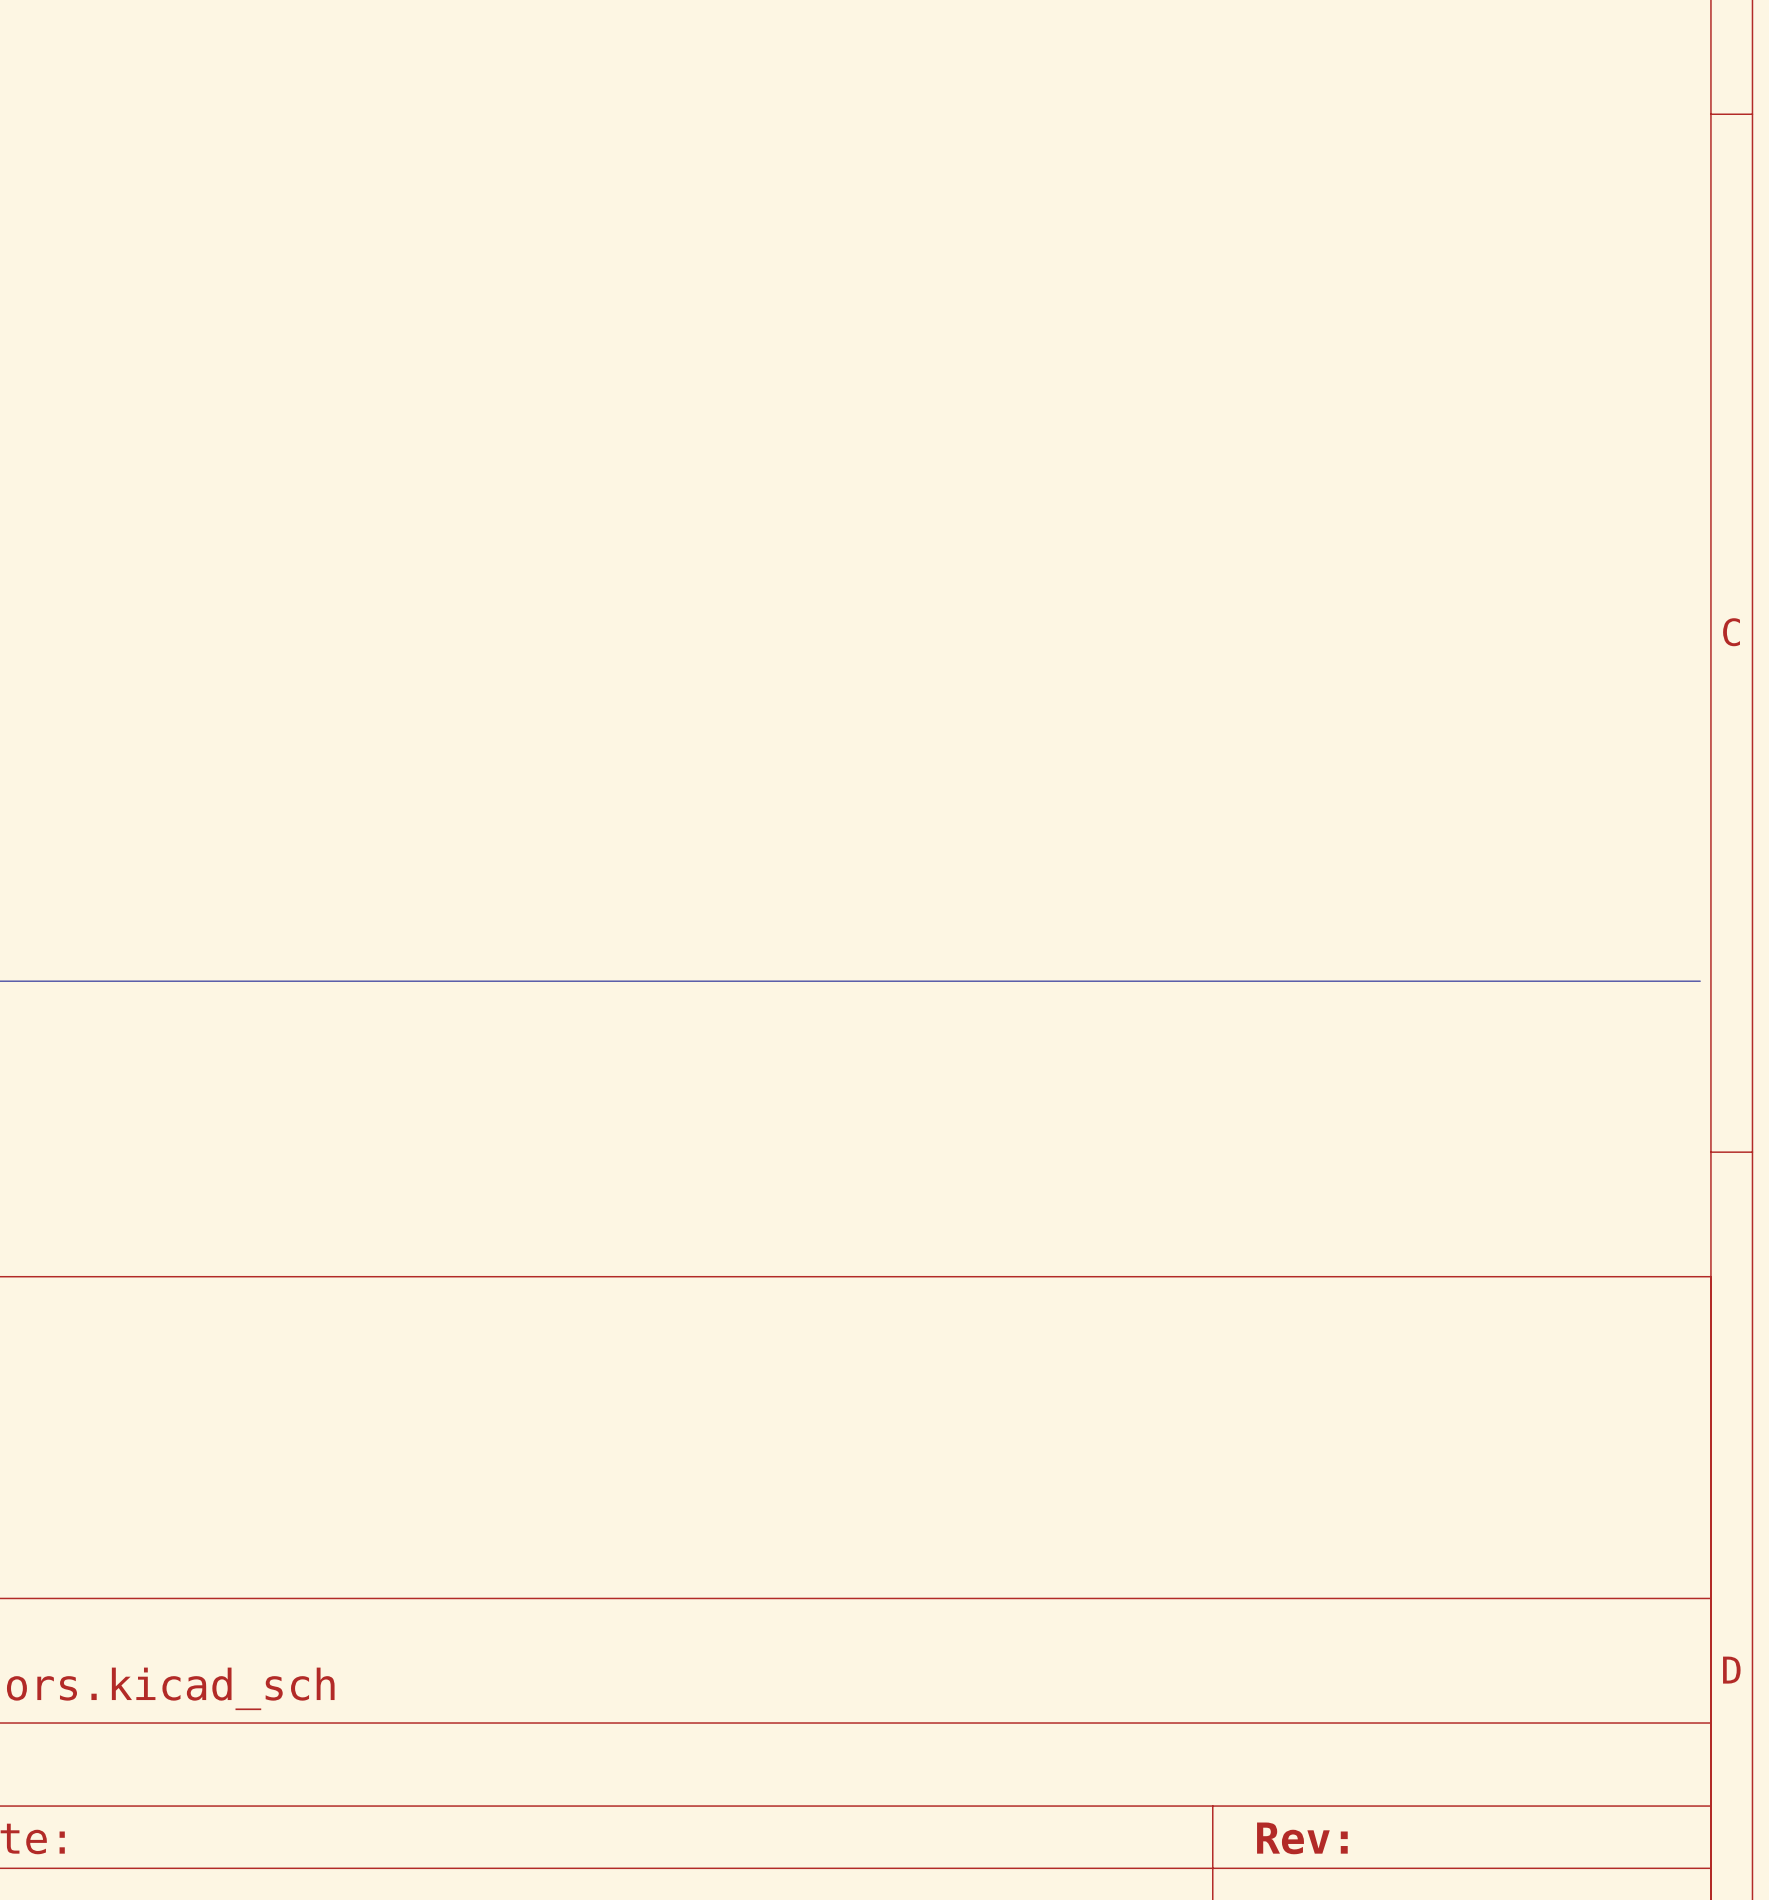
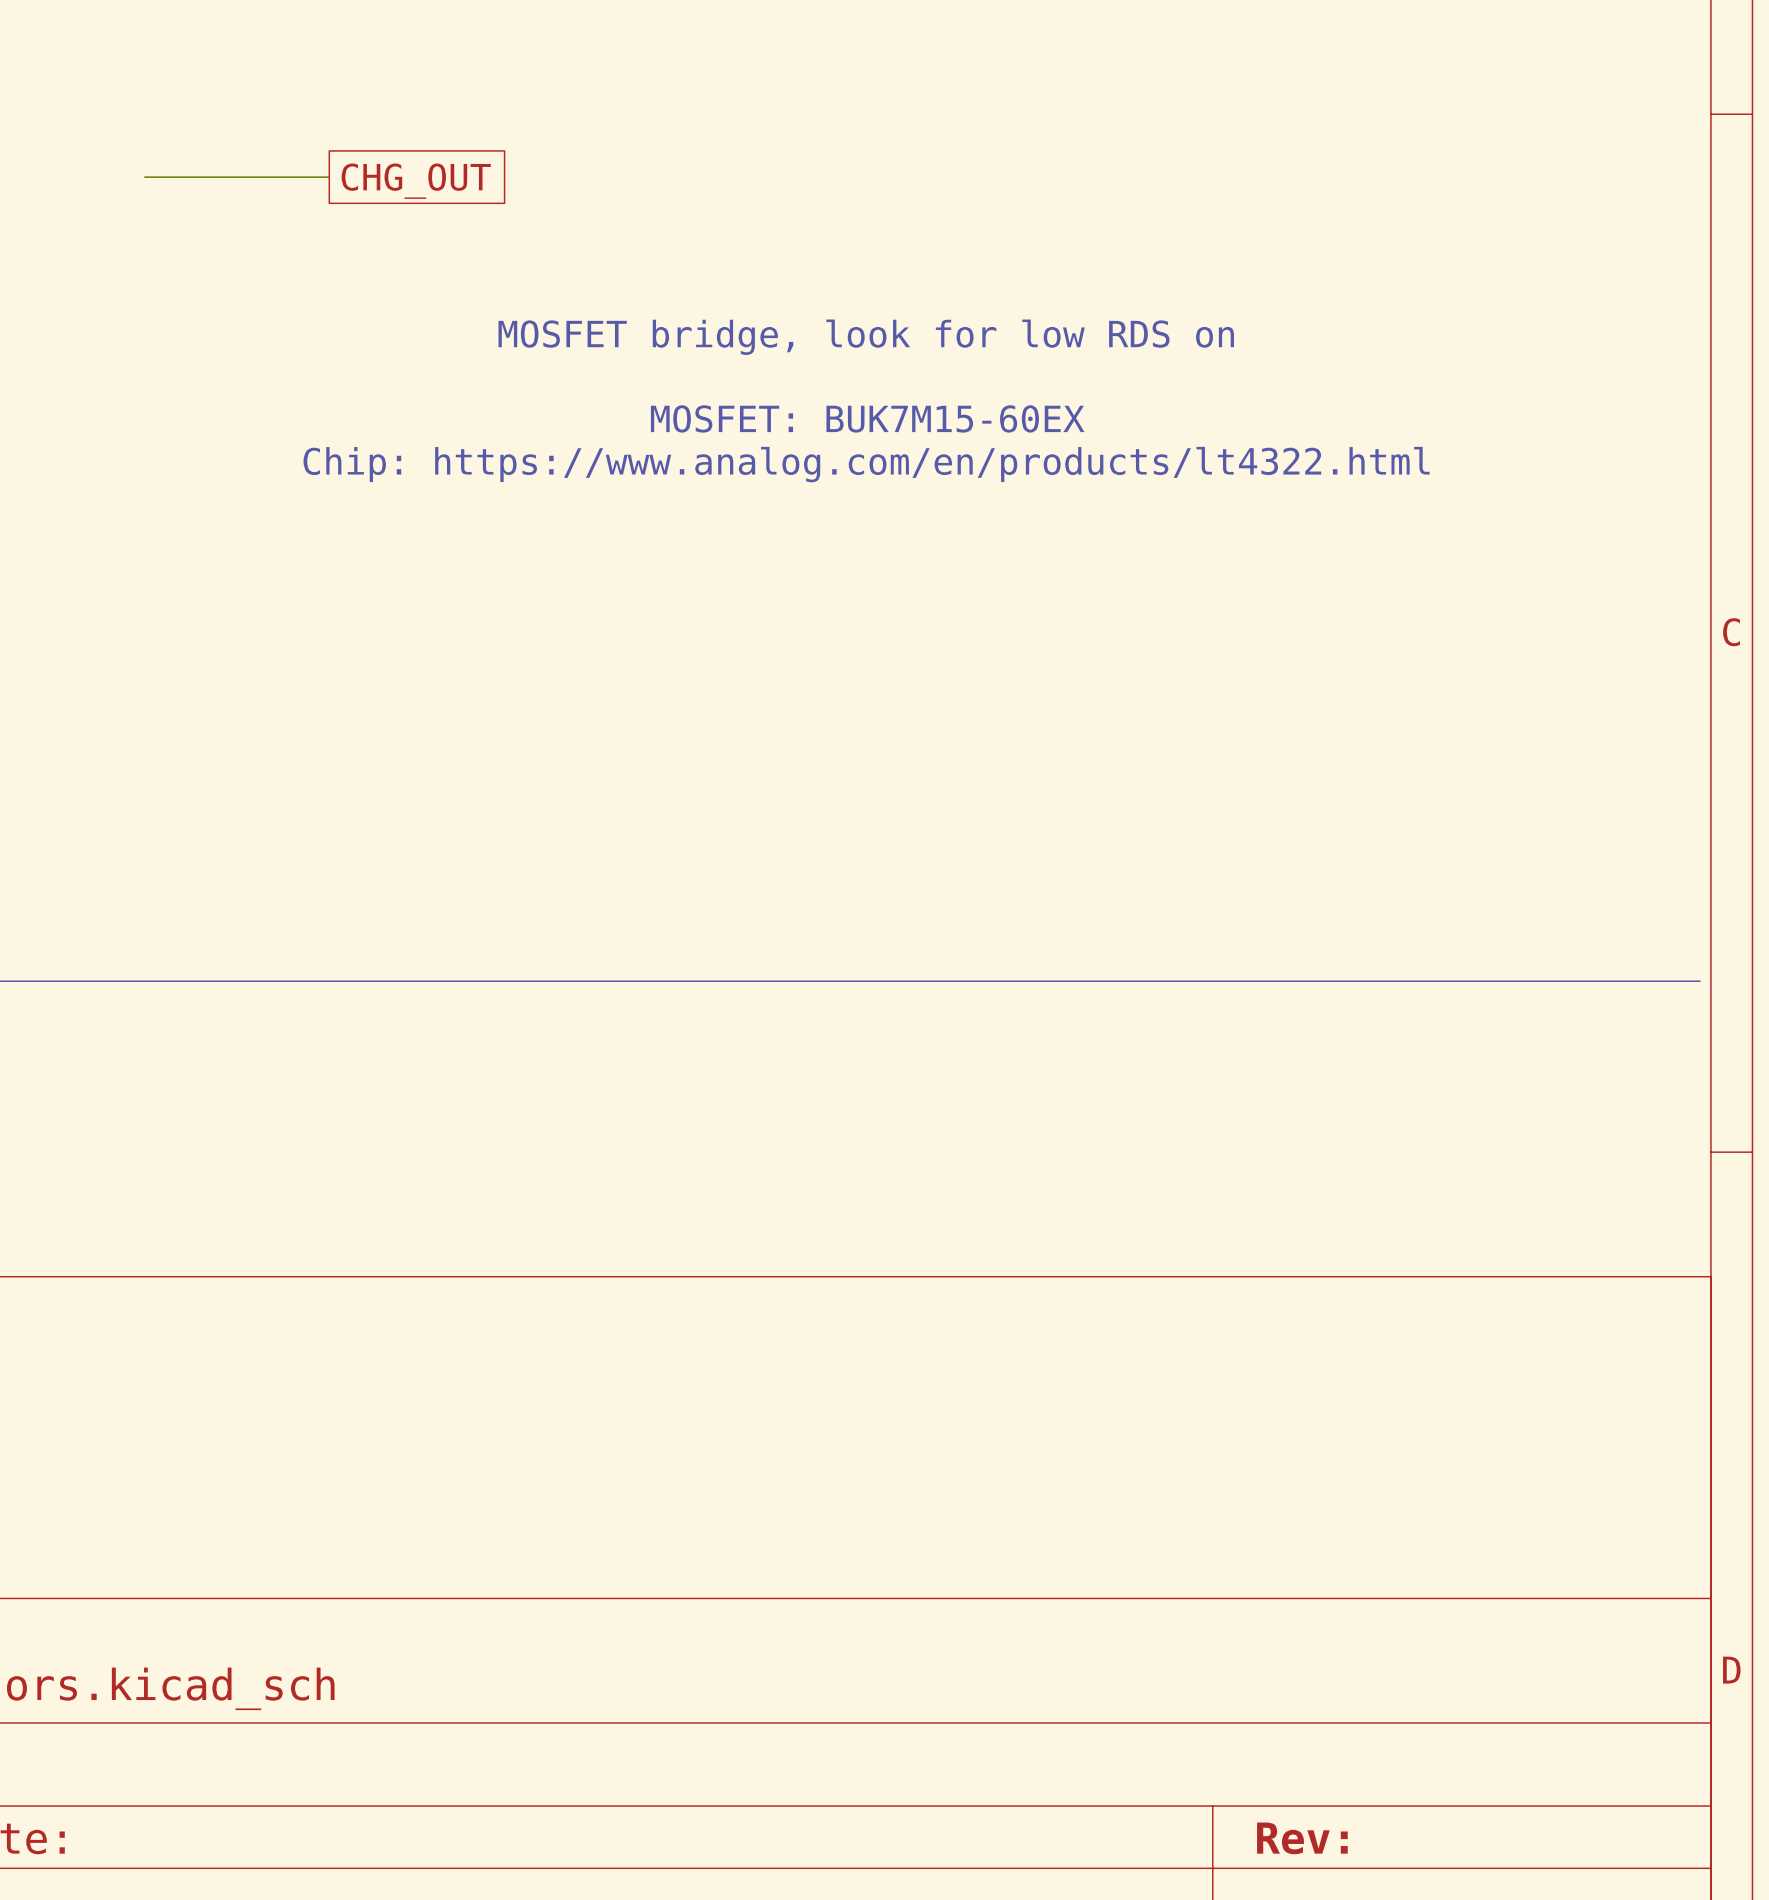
wire: none -> (144, 177) (329, 177)
global label: none -> CHG_OUT (416, 181)
text: none -> MOSFET bridge, look for low RDS on (866, 337)
text: none -> MOSFET: BUK7M15-60EX (867, 418)
text: none -> Chip: https://www.analog.com/en/products/lt4322.html (866, 464)

